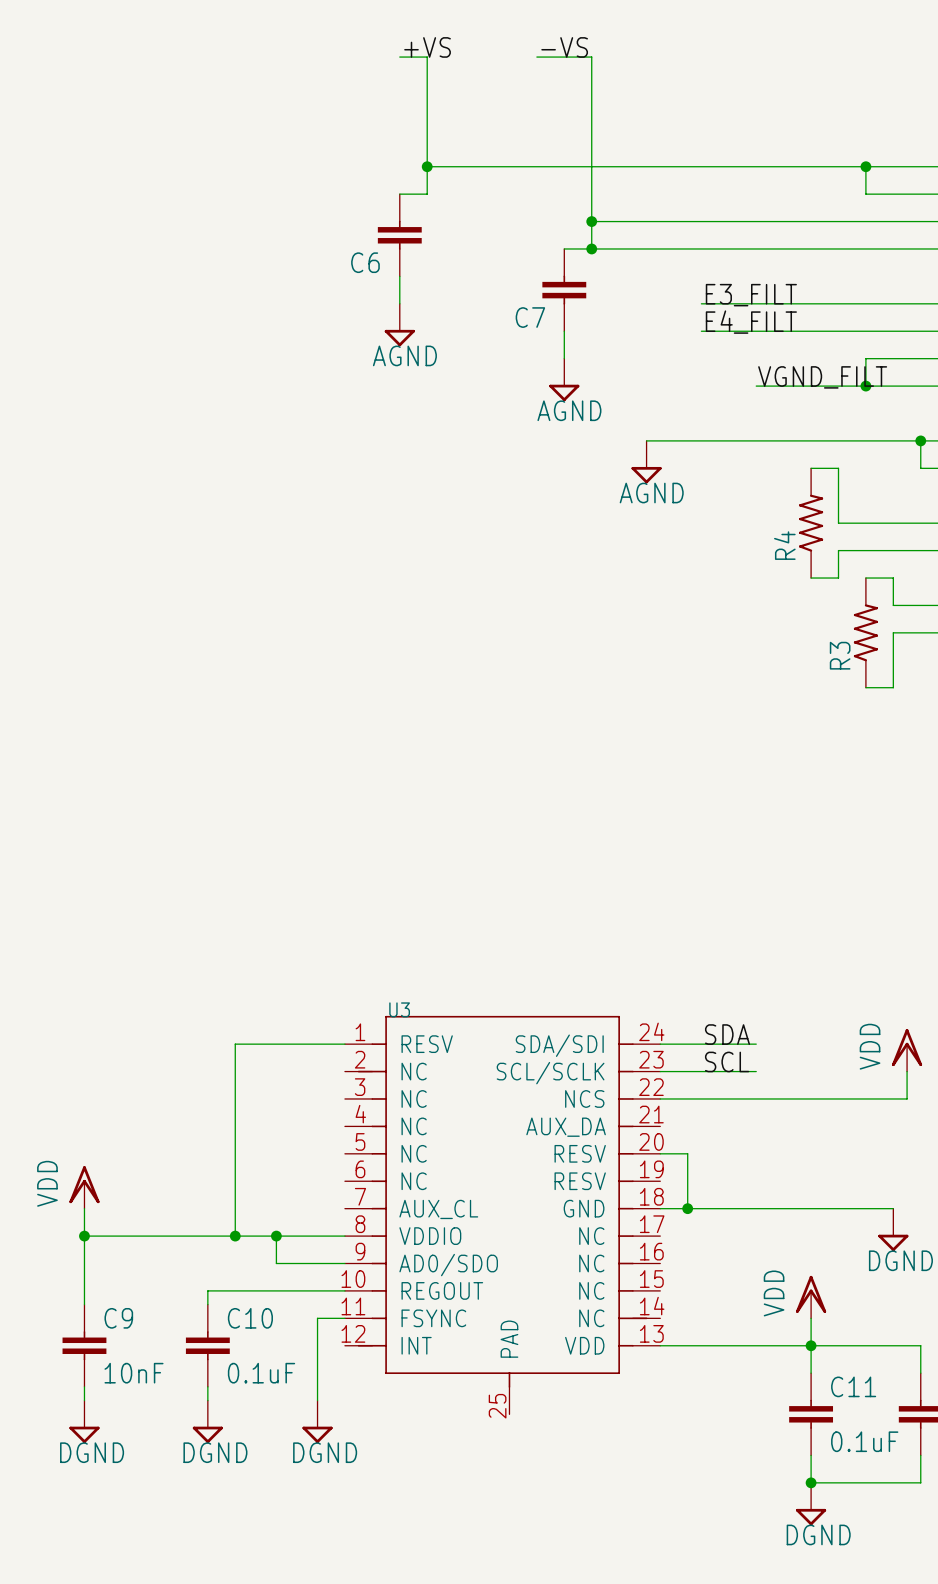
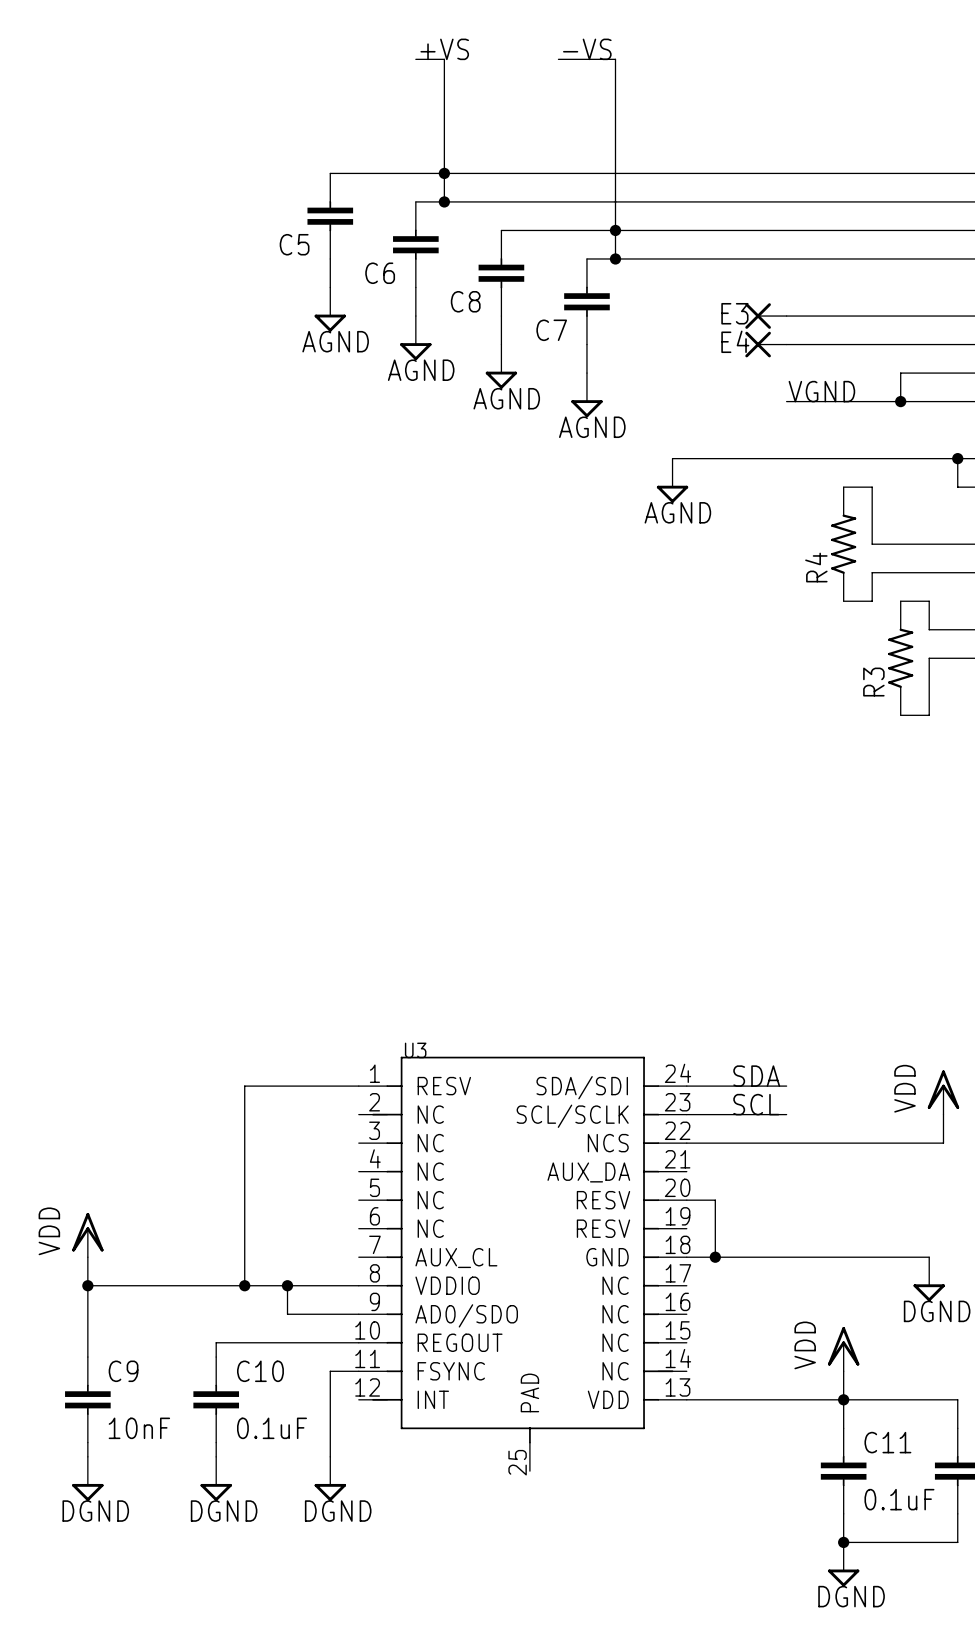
wire: none -> (330, 173) (444, 173)
wire: (865, 166) (865, 194) -> (444, 201) (900, 201)
junction: (865, 166) -> none
junction: none -> (444, 201)
C5: none -> (330, 216)
wire: none -> (501, 230) (615, 230)
wire: none -> (330, 258) (330, 287)
C8: none -> (501, 273)
label: E3_FILT (751, 295) -> none
power symbol: none -> AGND (330, 309)
wire: none -> (501, 316) (501, 344)
E3: none -> (765, 316)
label: E4_FILT (751, 322) -> none
E4: none -> (765, 344)
power symbol: none -> AGND (501, 366)
label: VGND_FILT (822, 377) -> VGND (821, 391)

